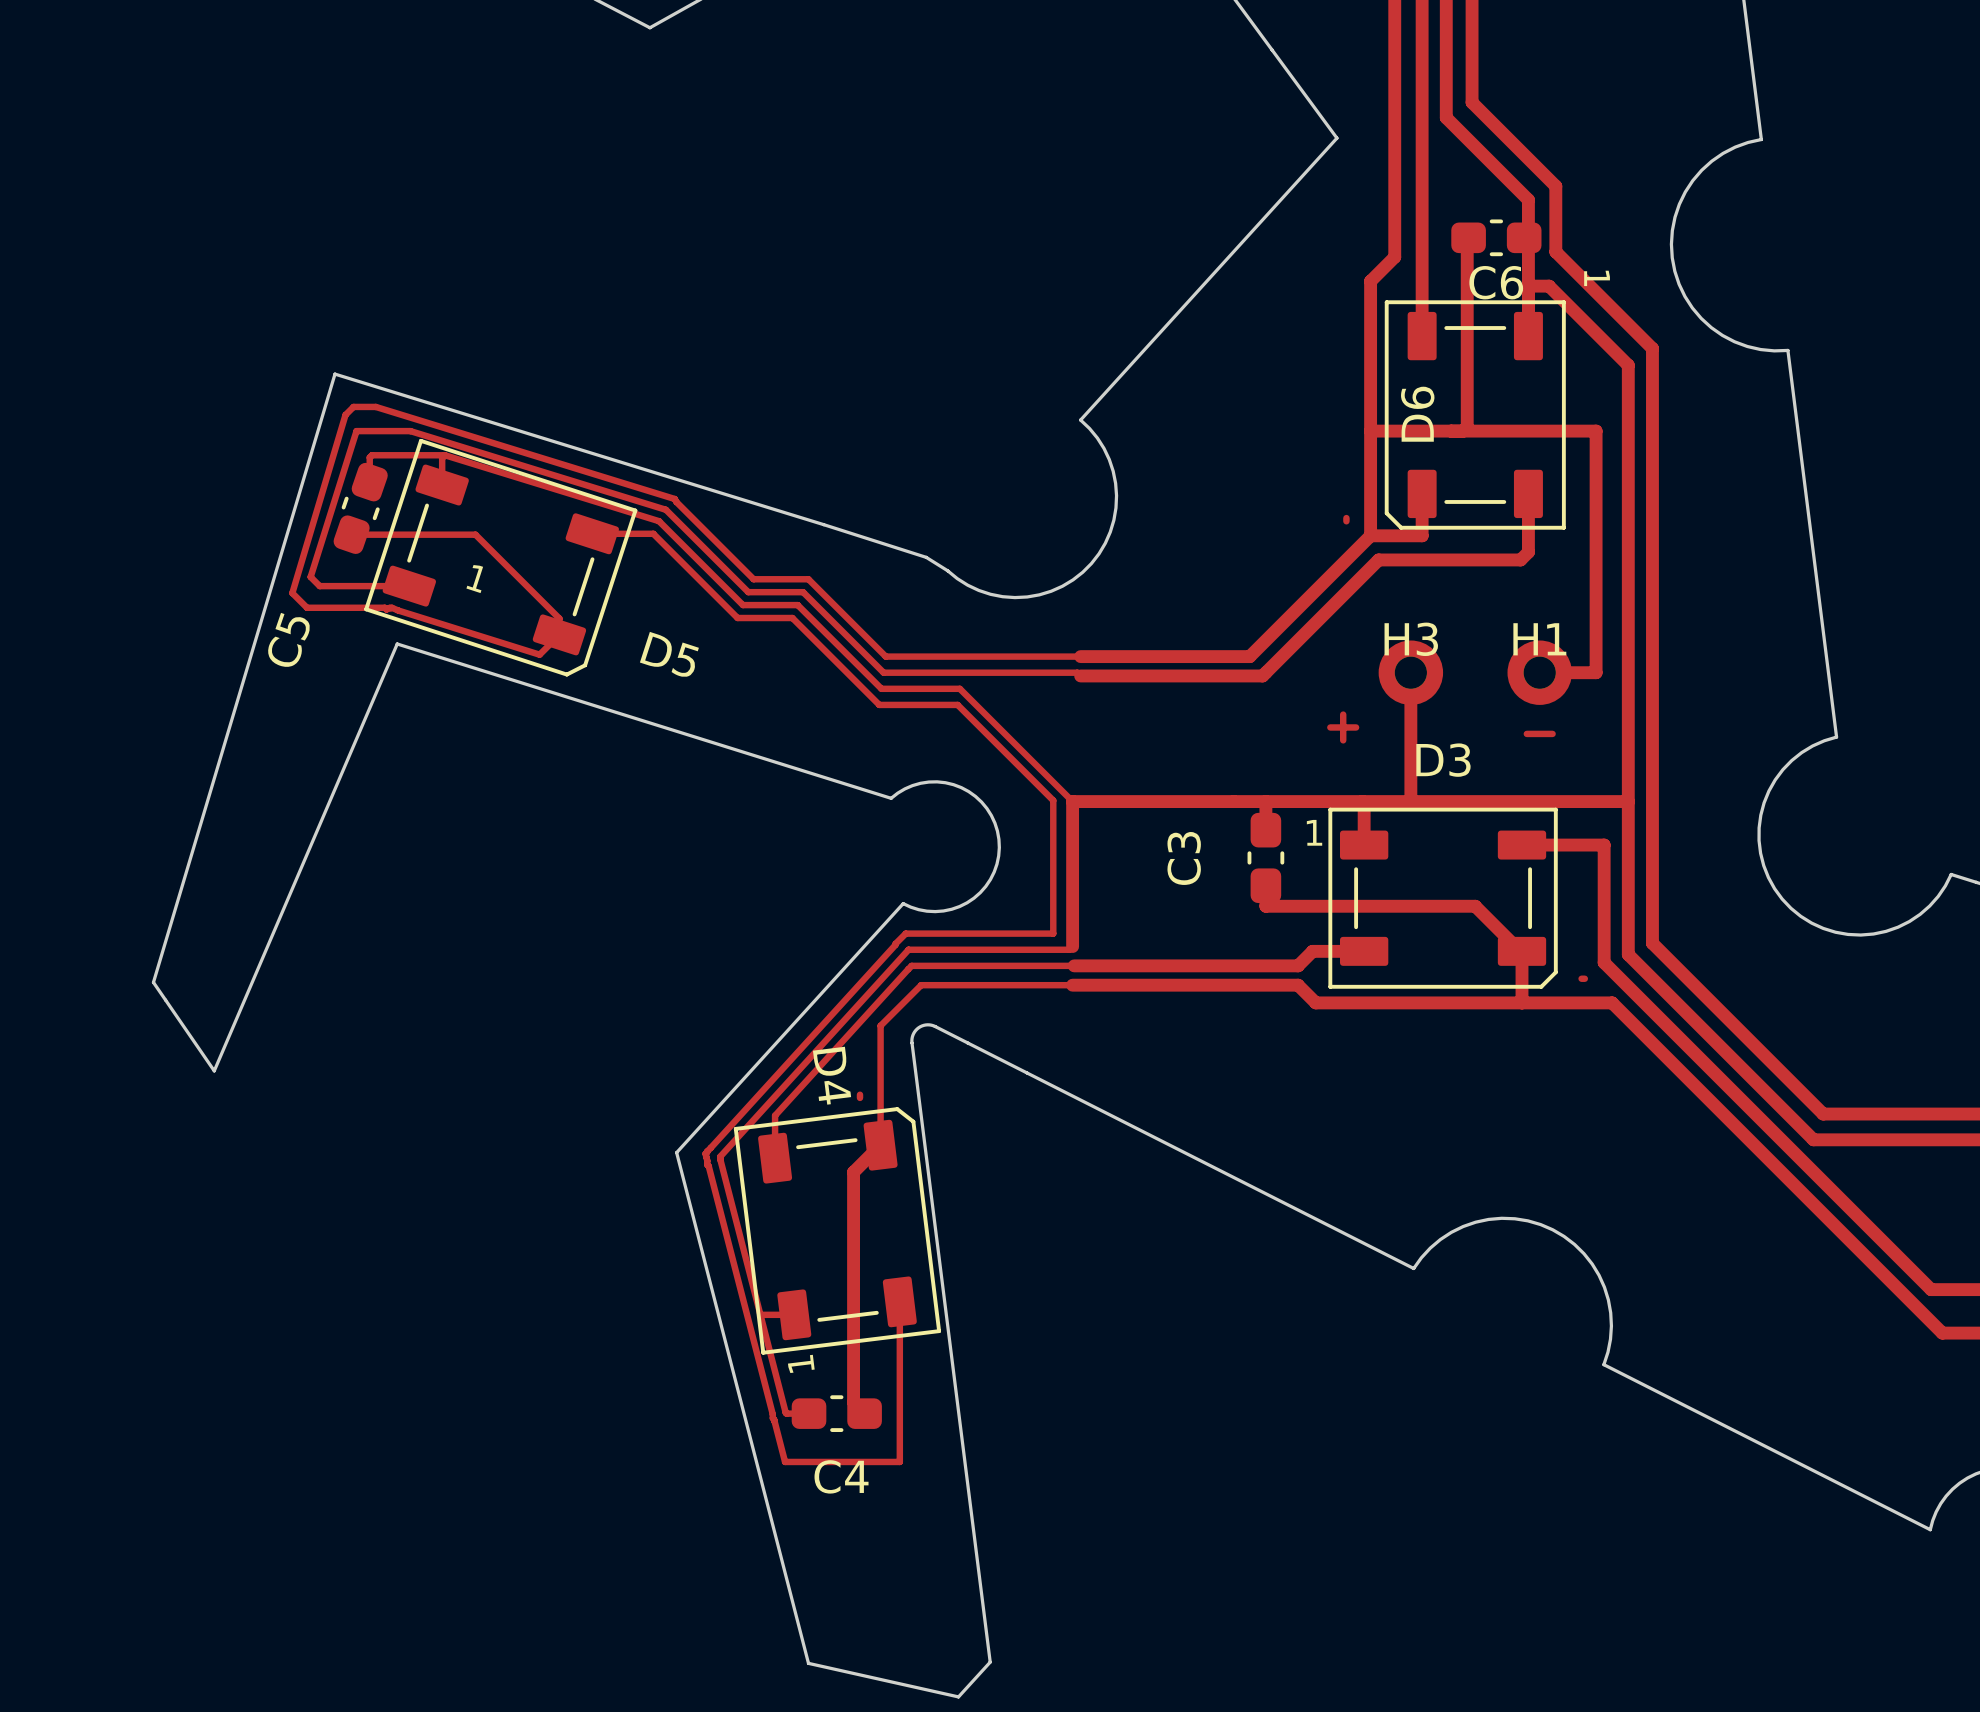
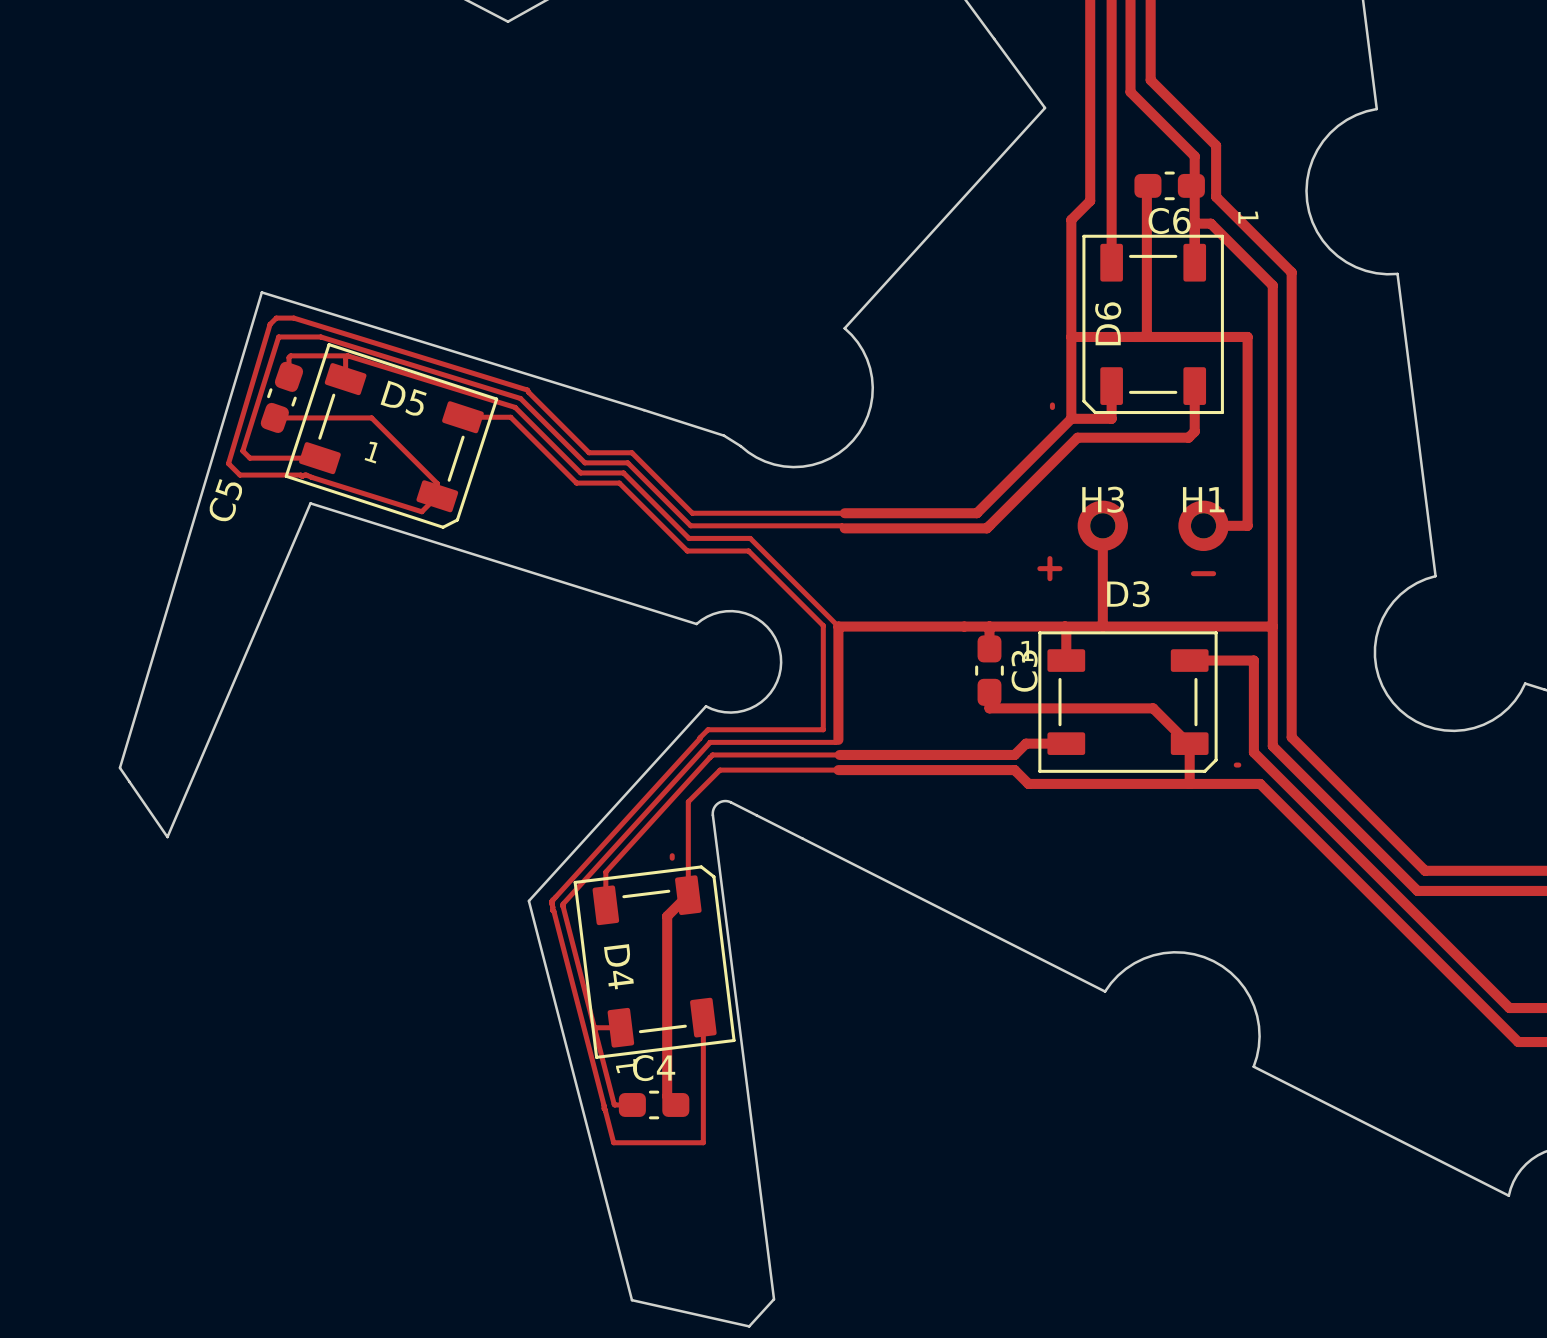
D5 name position: D5 (669, 654) -> D5 (403, 398)
C3 name position: C3 (1184, 858) -> C3 (1024, 671)
D4 name position: D4 (832, 1075) -> D4 (618, 966)
C4 name position: C4 (841, 1476) -> C4 (654, 1068)

